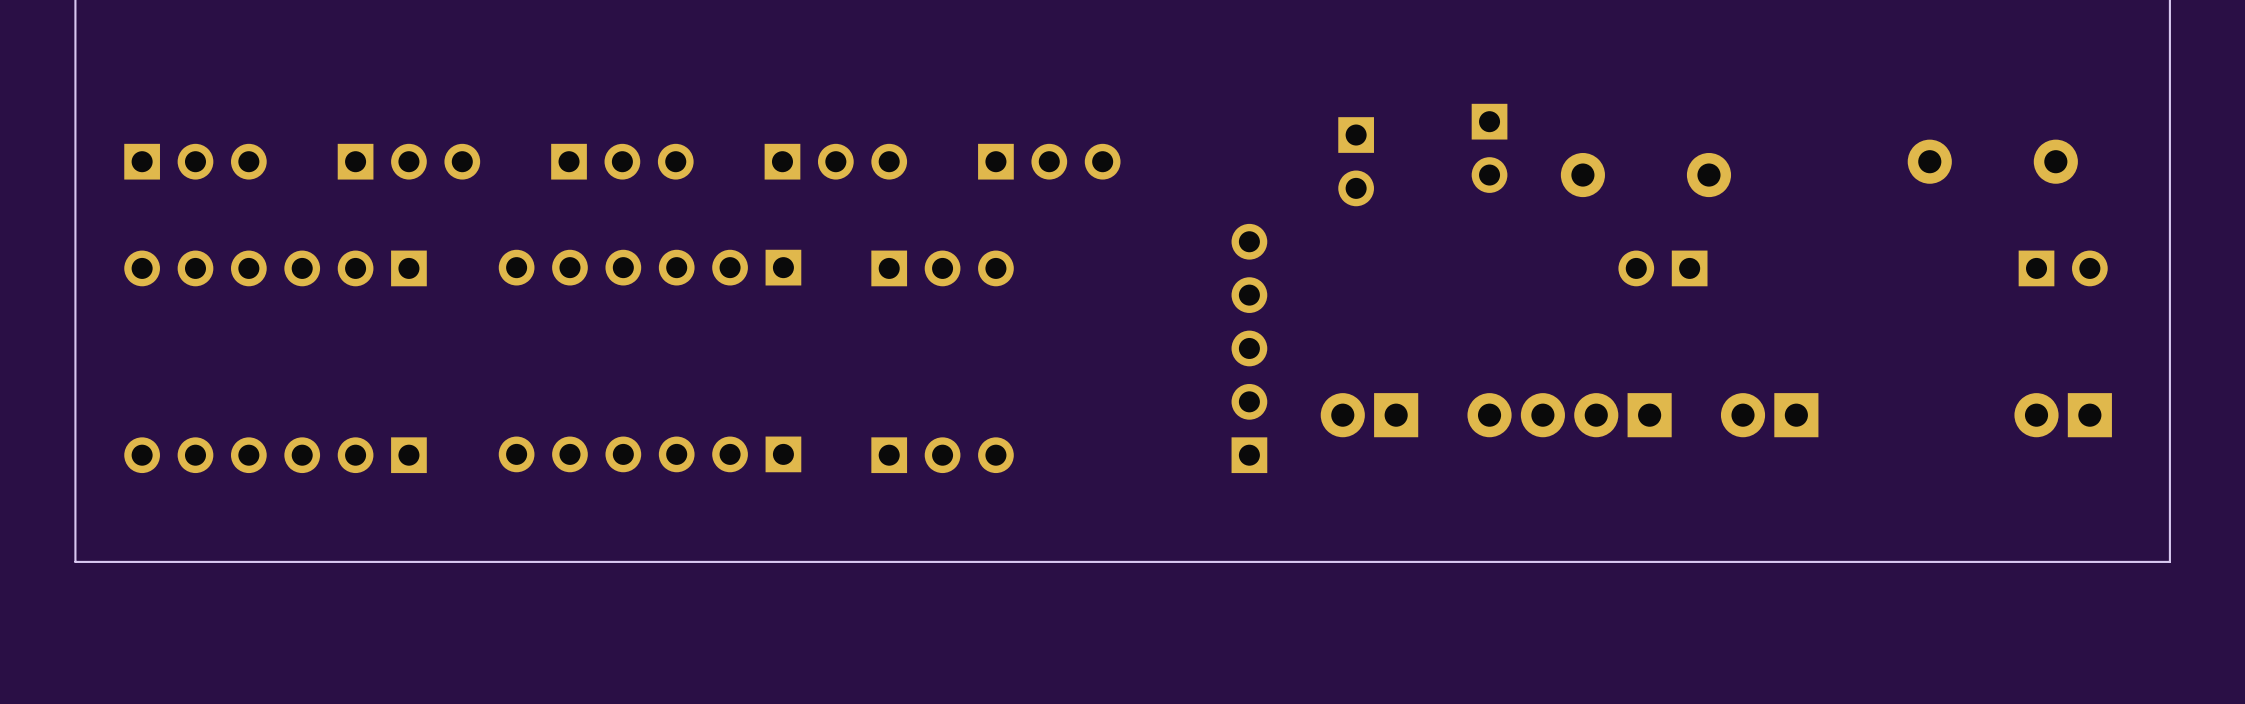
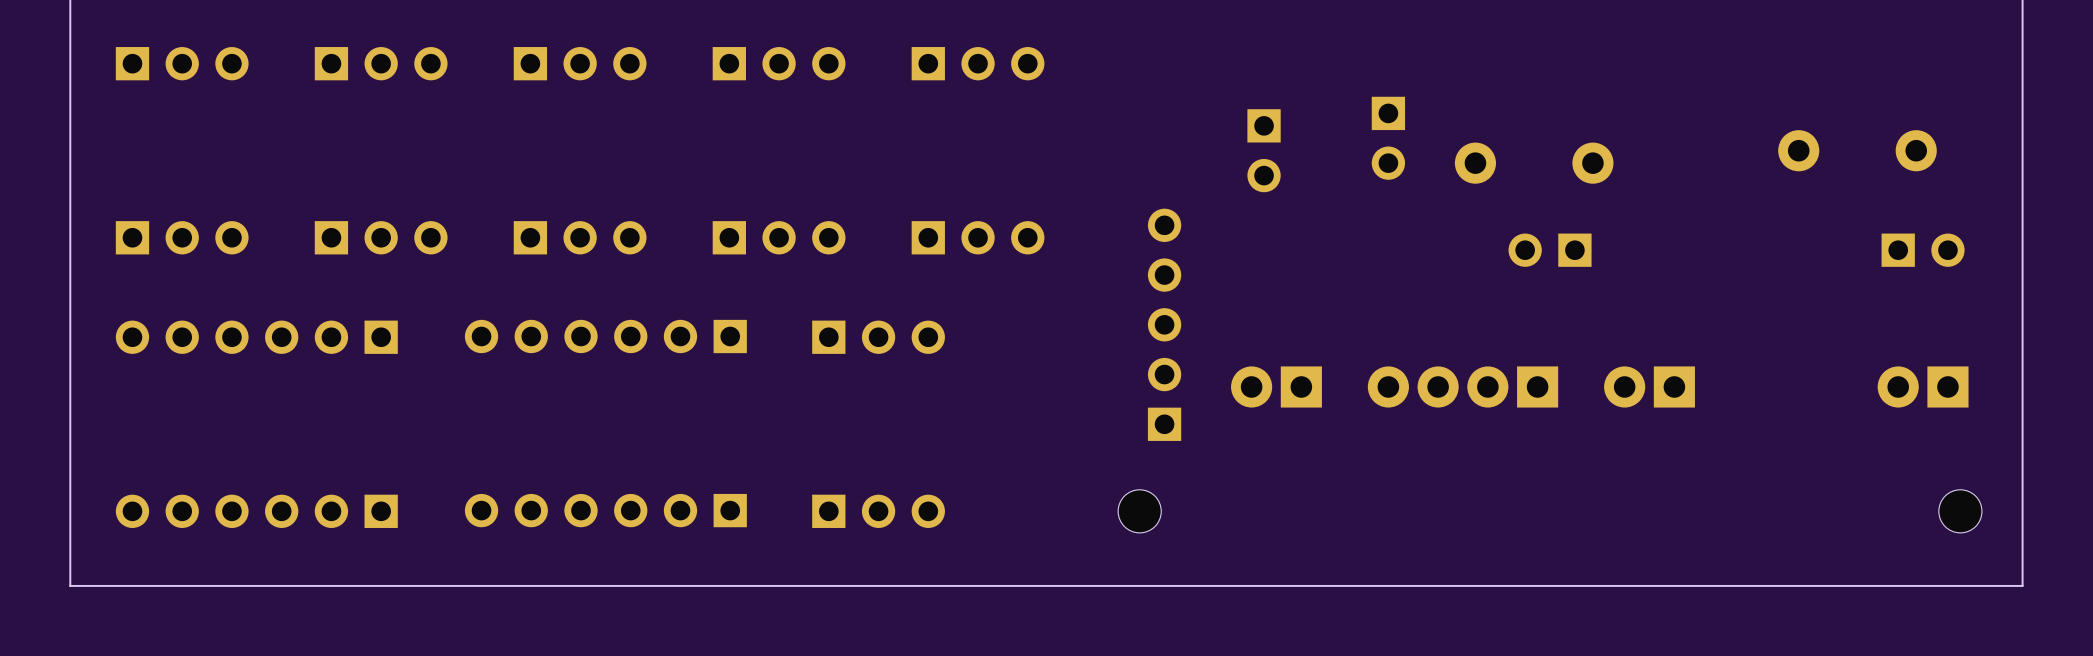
part: none -> (182, 63)
part: none -> (381, 63)
part: none -> (580, 63)
part: none -> (779, 63)
part: none -> (978, 63)
part: (195, 161) -> none
part: (408, 161) -> none
part: (622, 161) -> none
part: (835, 161) -> none
part: (1049, 161) -> none
part: none -> (182, 237)
part: none -> (381, 237)
part: none -> (580, 237)
part: none -> (779, 237)
part: none -> (978, 237)
part: (650, 267) -> none
part: (275, 268) -> none
part: (942, 268) -> none
part: none -> (256, 337)
part: none -> (605, 336)
part: none -> (878, 337)
part: (650, 454) -> none
part: (275, 455) -> none
part: (942, 455) -> none
part: none -> (605, 510)
part: none -> (256, 511)
part: none -> (878, 511)
part: none -> (1139, 511)
part: none -> (1960, 511)
board edge: (2169, 561) (75, 561) -> (2022, 523) (2022, 585) (70, 585) (70, 523)

